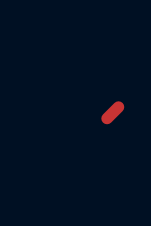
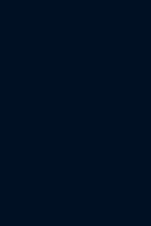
track: (118, 107) (107, 118) -> none

